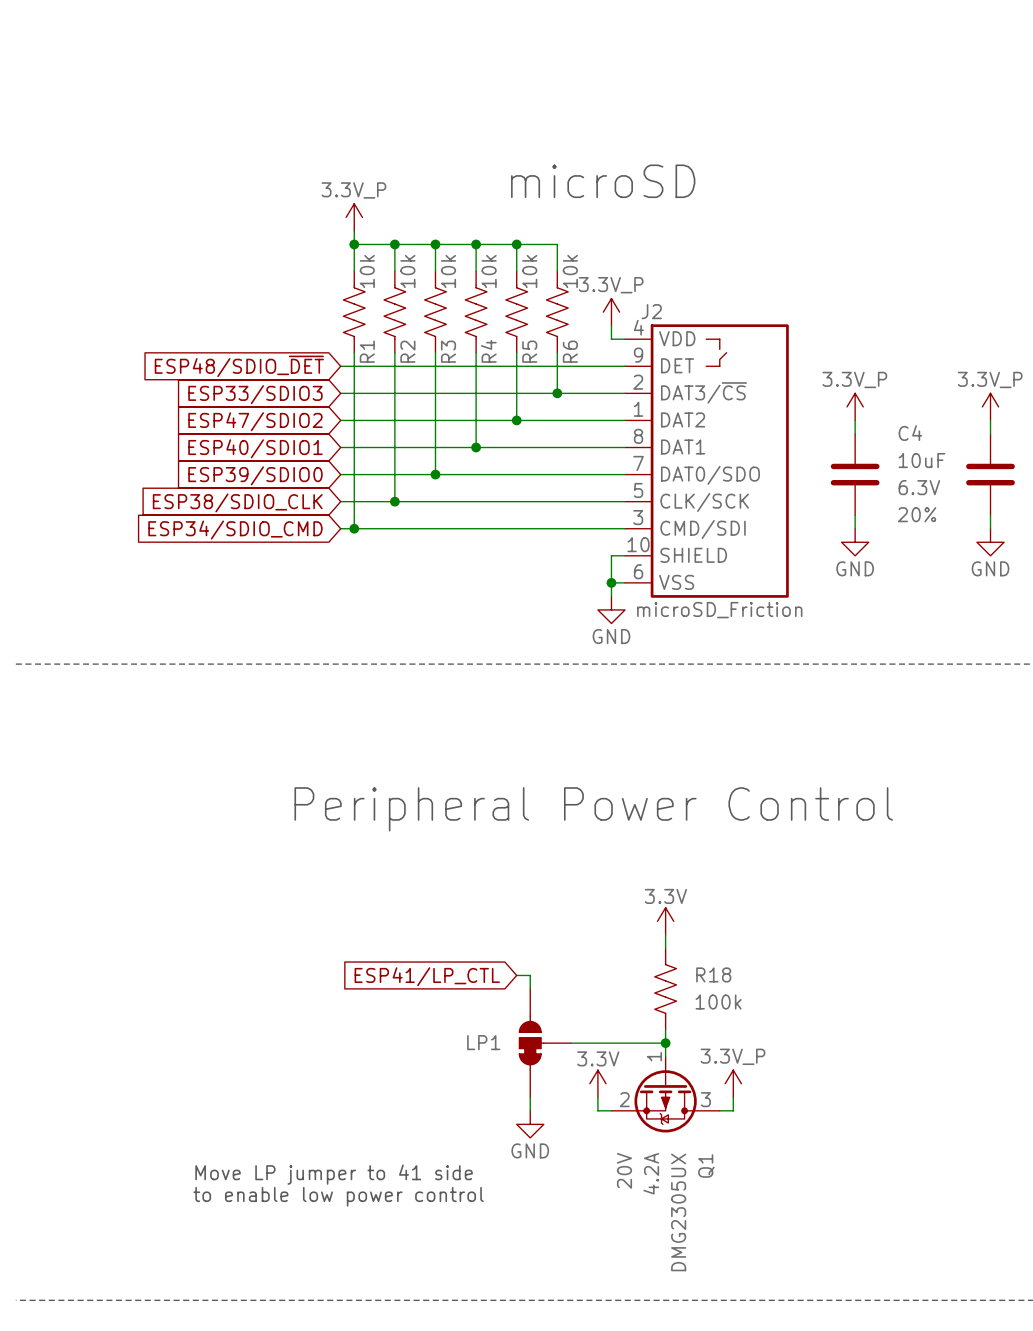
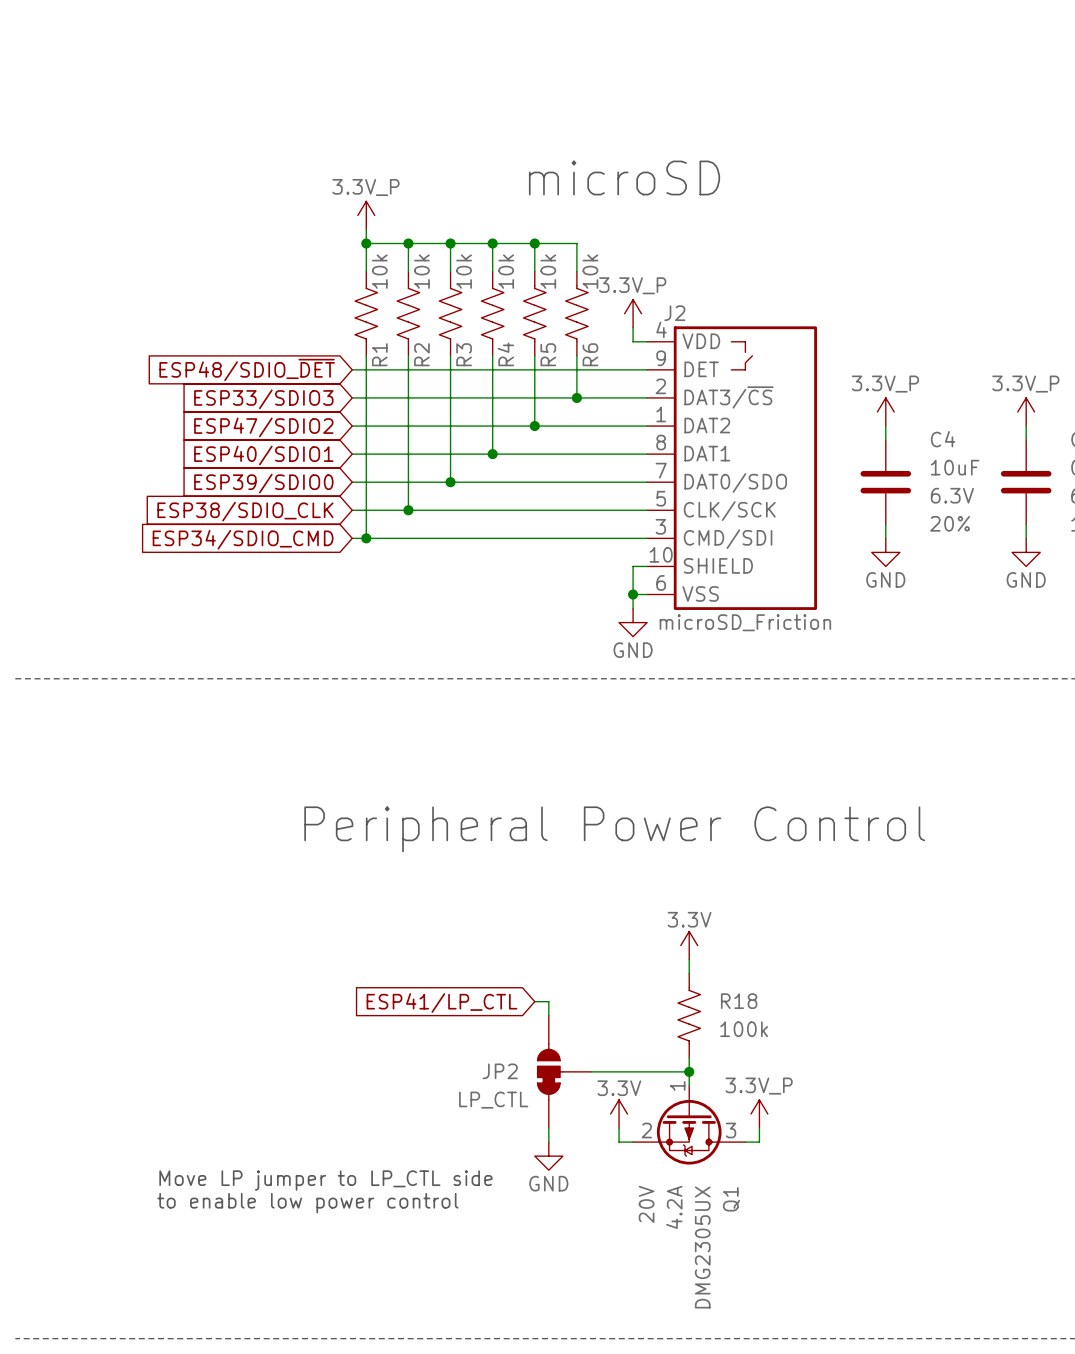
LP1 name: LP1 (483, 1042) -> JP2 (500, 1071)
LP1 value: none -> LP_CTL (493, 1100)
text: Move LP jumper to 41 side (334, 1174) -> Move LP jumper to LP_CTL side (325, 1180)
text position: to enable low power control (338, 1196) -> to enable low power control (307, 1203)

